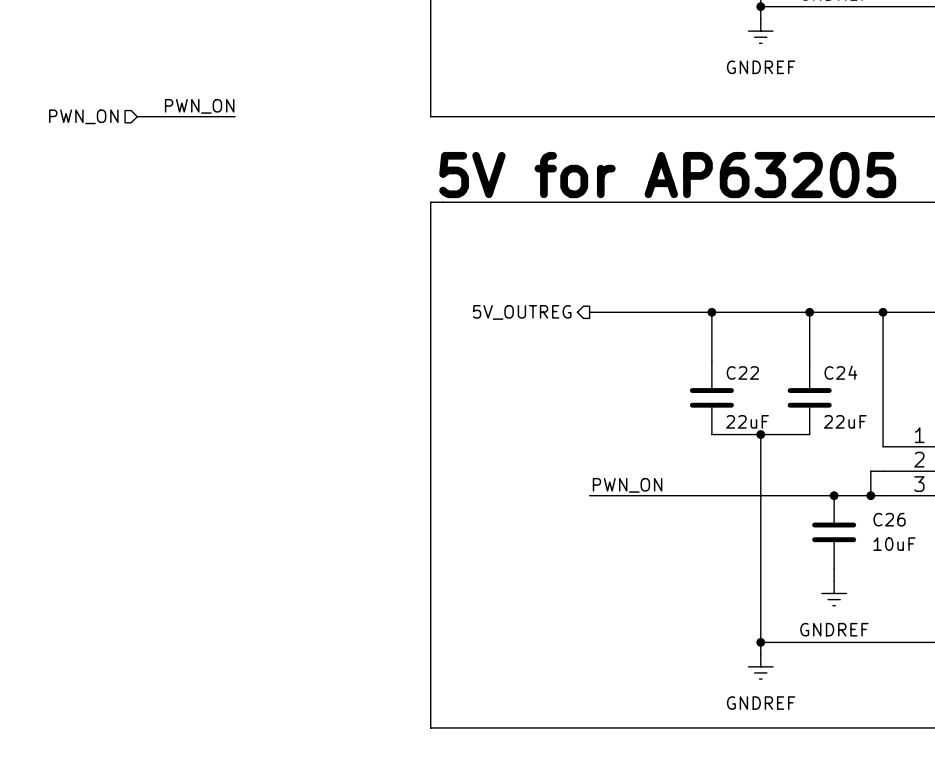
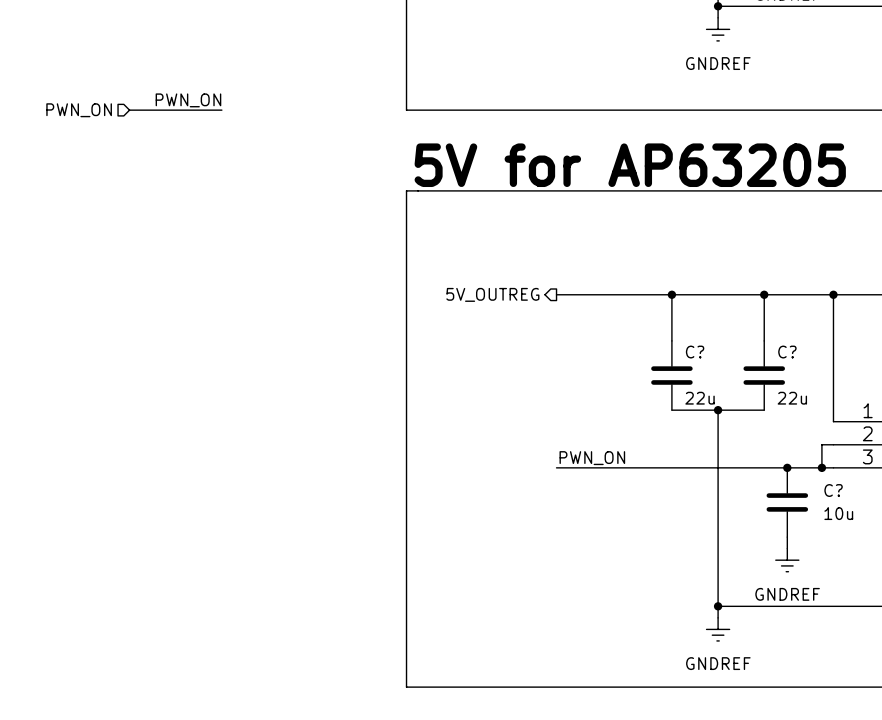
C22 name: C22 (742, 372) -> C? (695, 352)
C24 name: C24 (840, 372) -> C? (787, 352)
C22 value: 22uF (747, 421) -> 22u (700, 398)
C24 value: 22uF (845, 421) -> 22u (792, 398)
C26 name: C26 (889, 519) -> C? (833, 490)
C26 value: 10uF (894, 544) -> 10u (838, 513)

